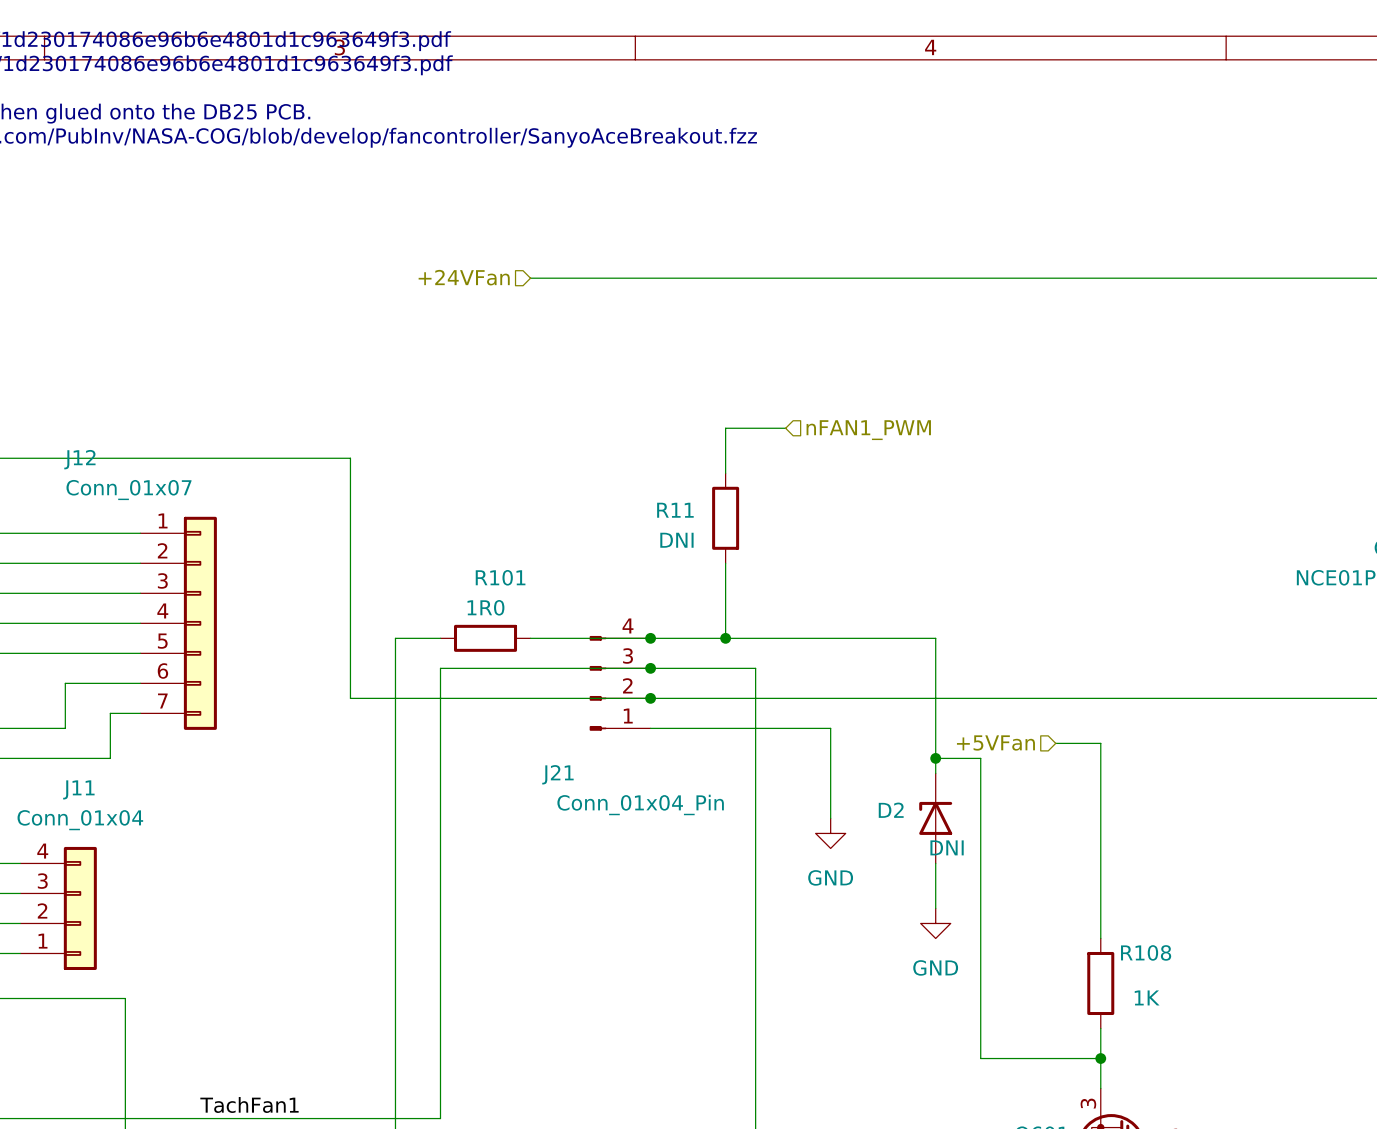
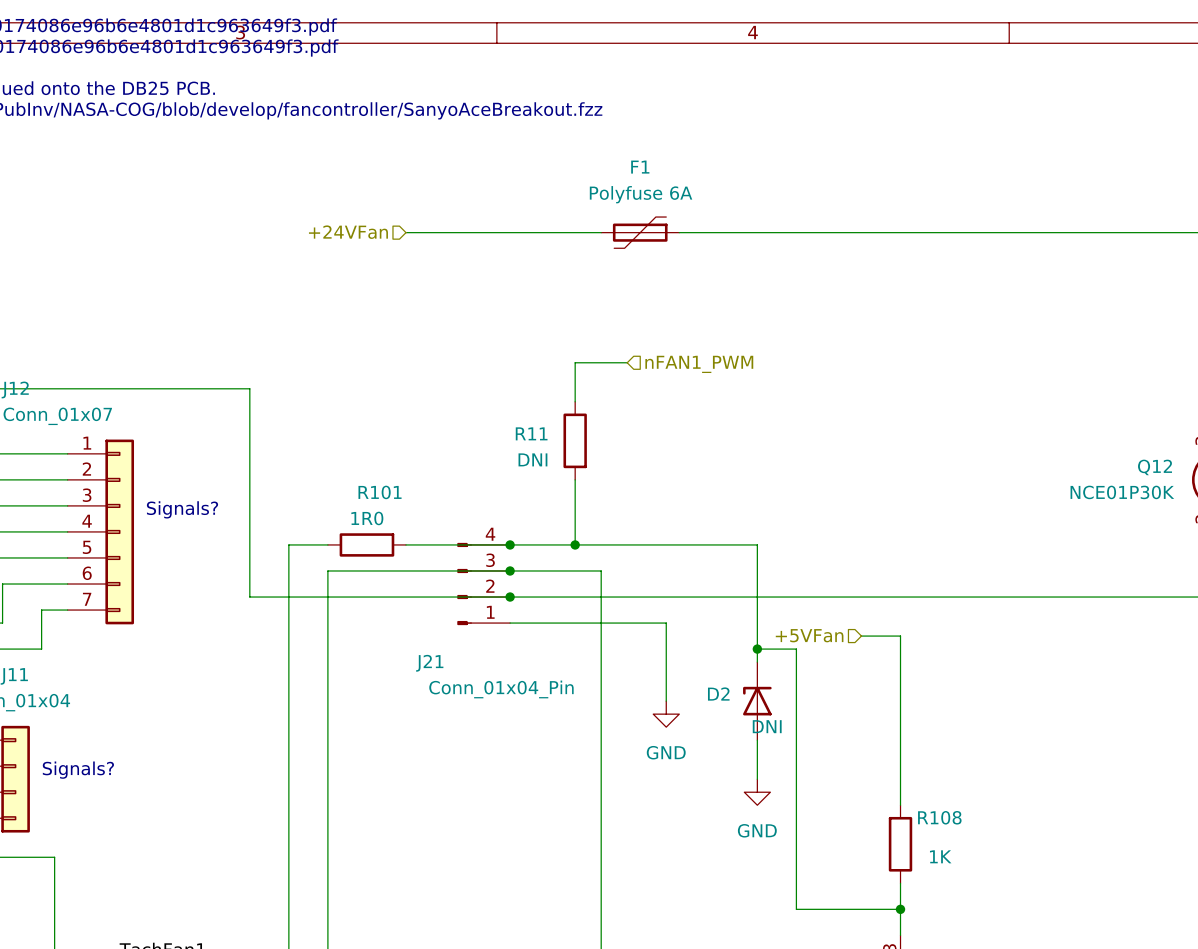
F1: none -> Polyfuse 6A (640, 232)
text: none -> Signals? (182, 509)
text: none -> Signals? (78, 770)

